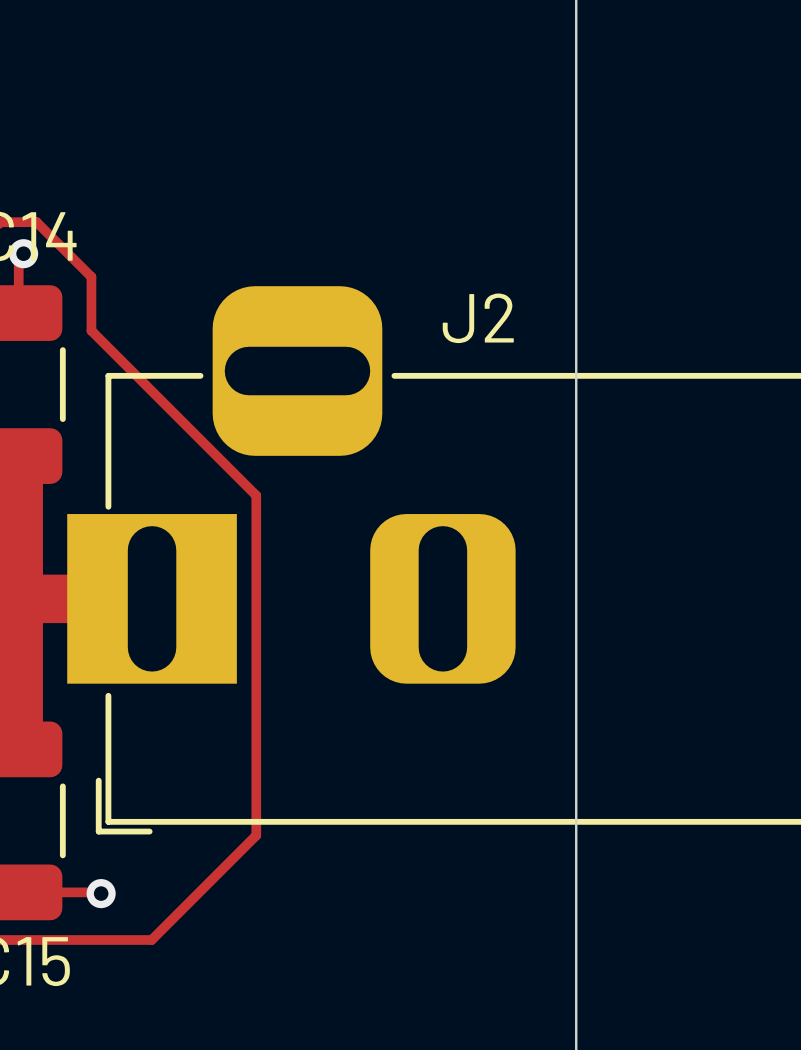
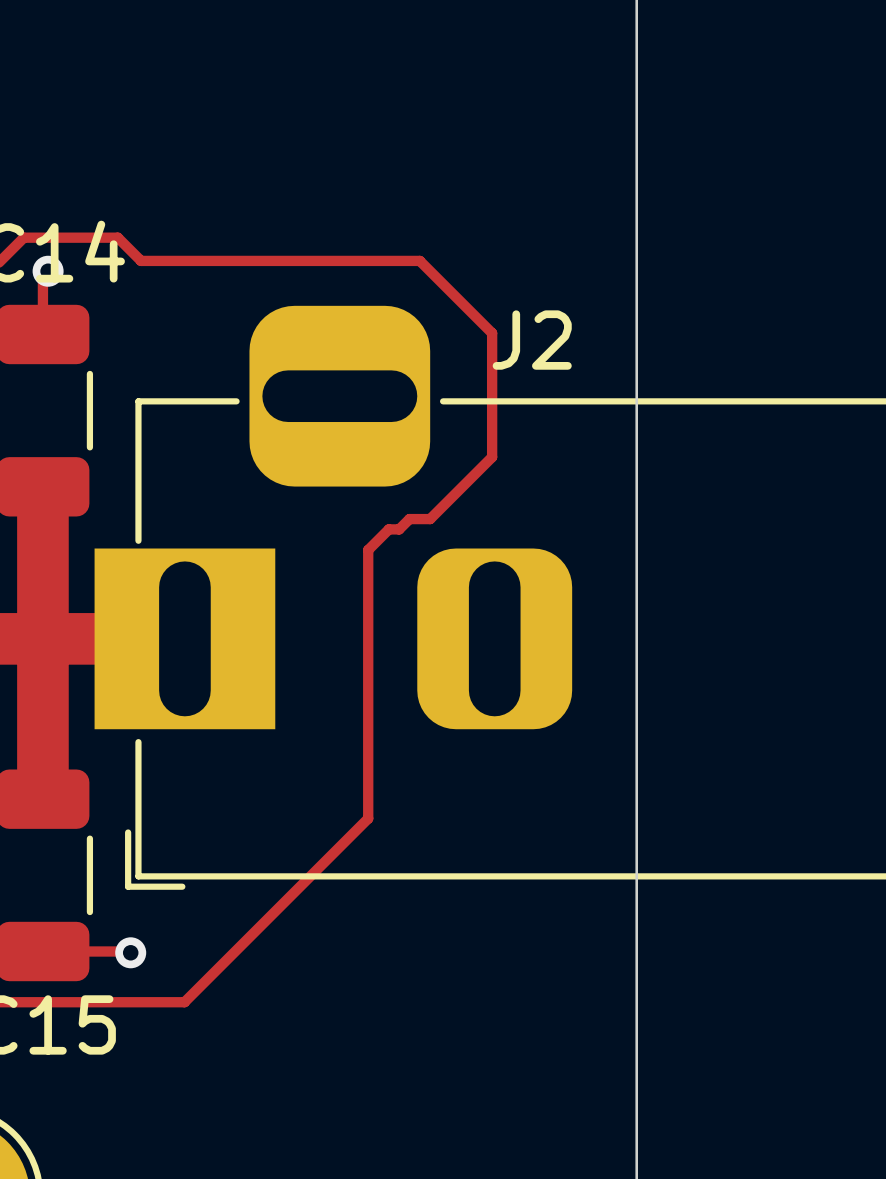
top track: (36, 222) (91, 277) (91, 330) (256, 495) (256, 835) -> (62, 237) (117, 237) (141, 260) (419, 260) (492, 333) (492, 457) (430, 519) (409, 519) (399, 529) (388, 529) (368, 550) (368, 818) (295, 890)

